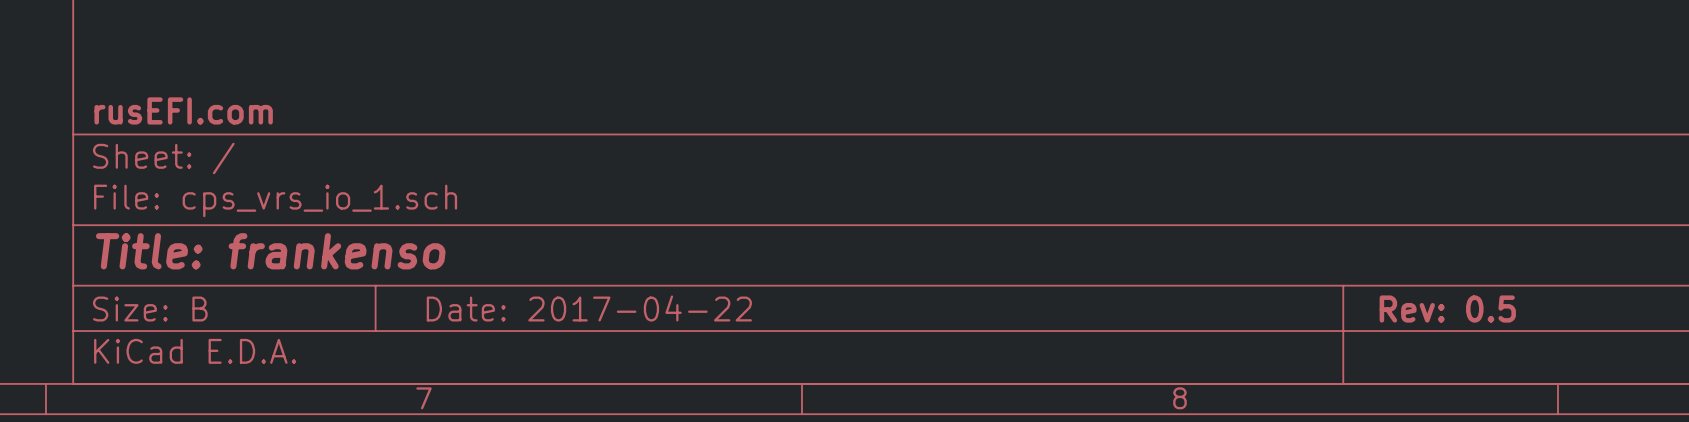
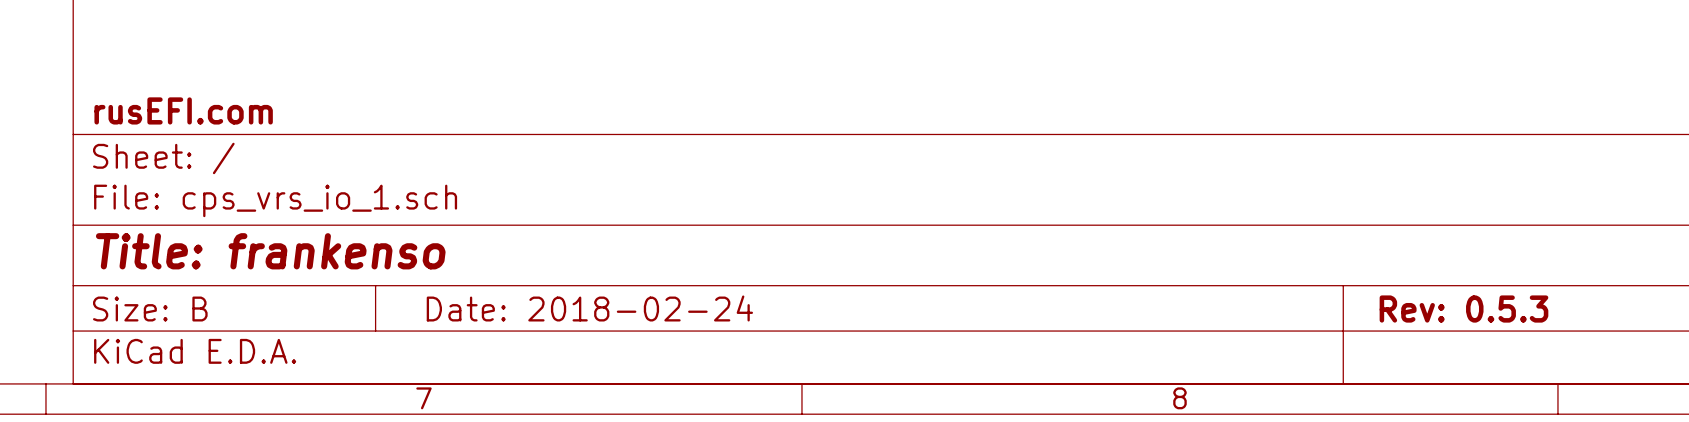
title block: Date: 2017-04-22 (589, 308) -> Date: 2018-02-24 (589, 308)
title block: Rev: 0.5 (1447, 309) -> Rev: 0.5.3 (1463, 309)

